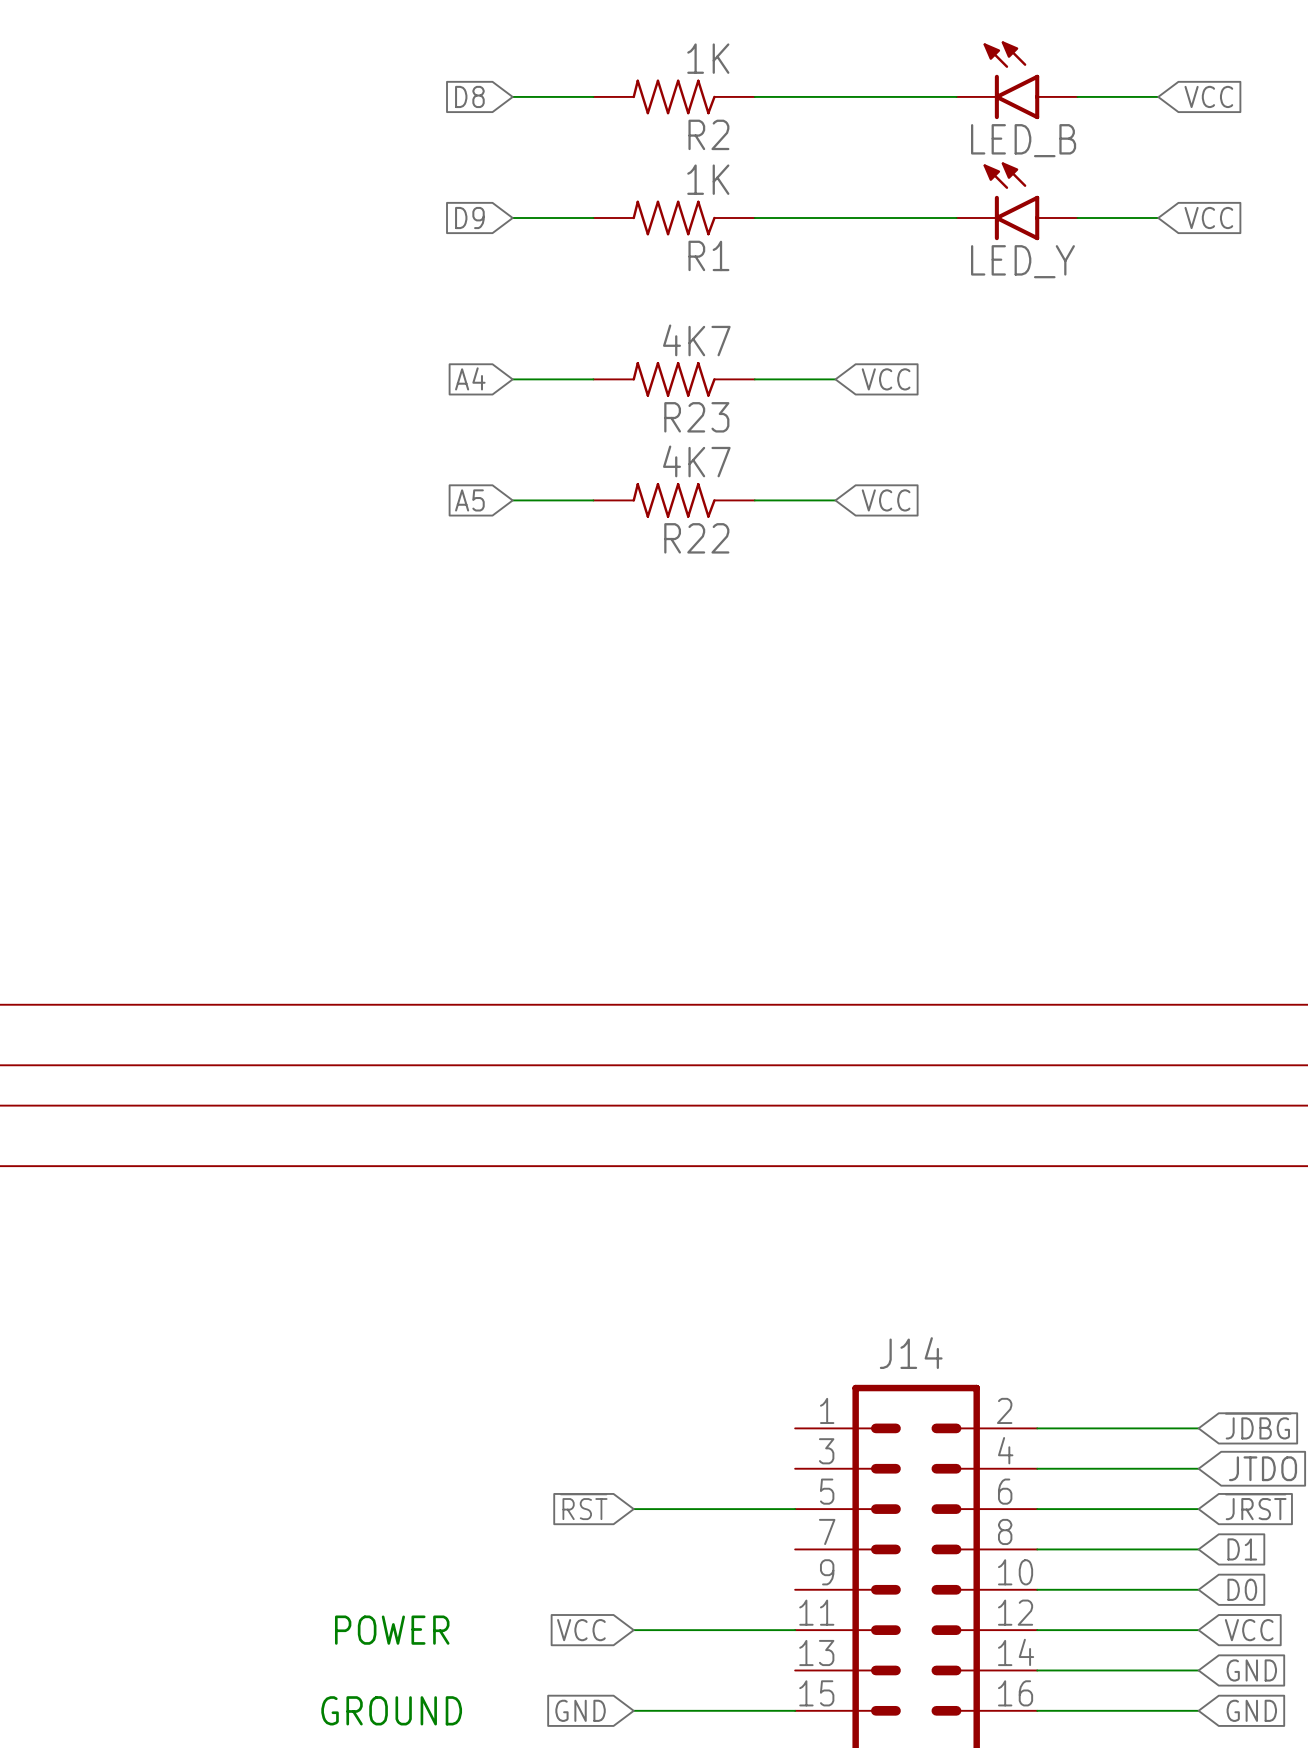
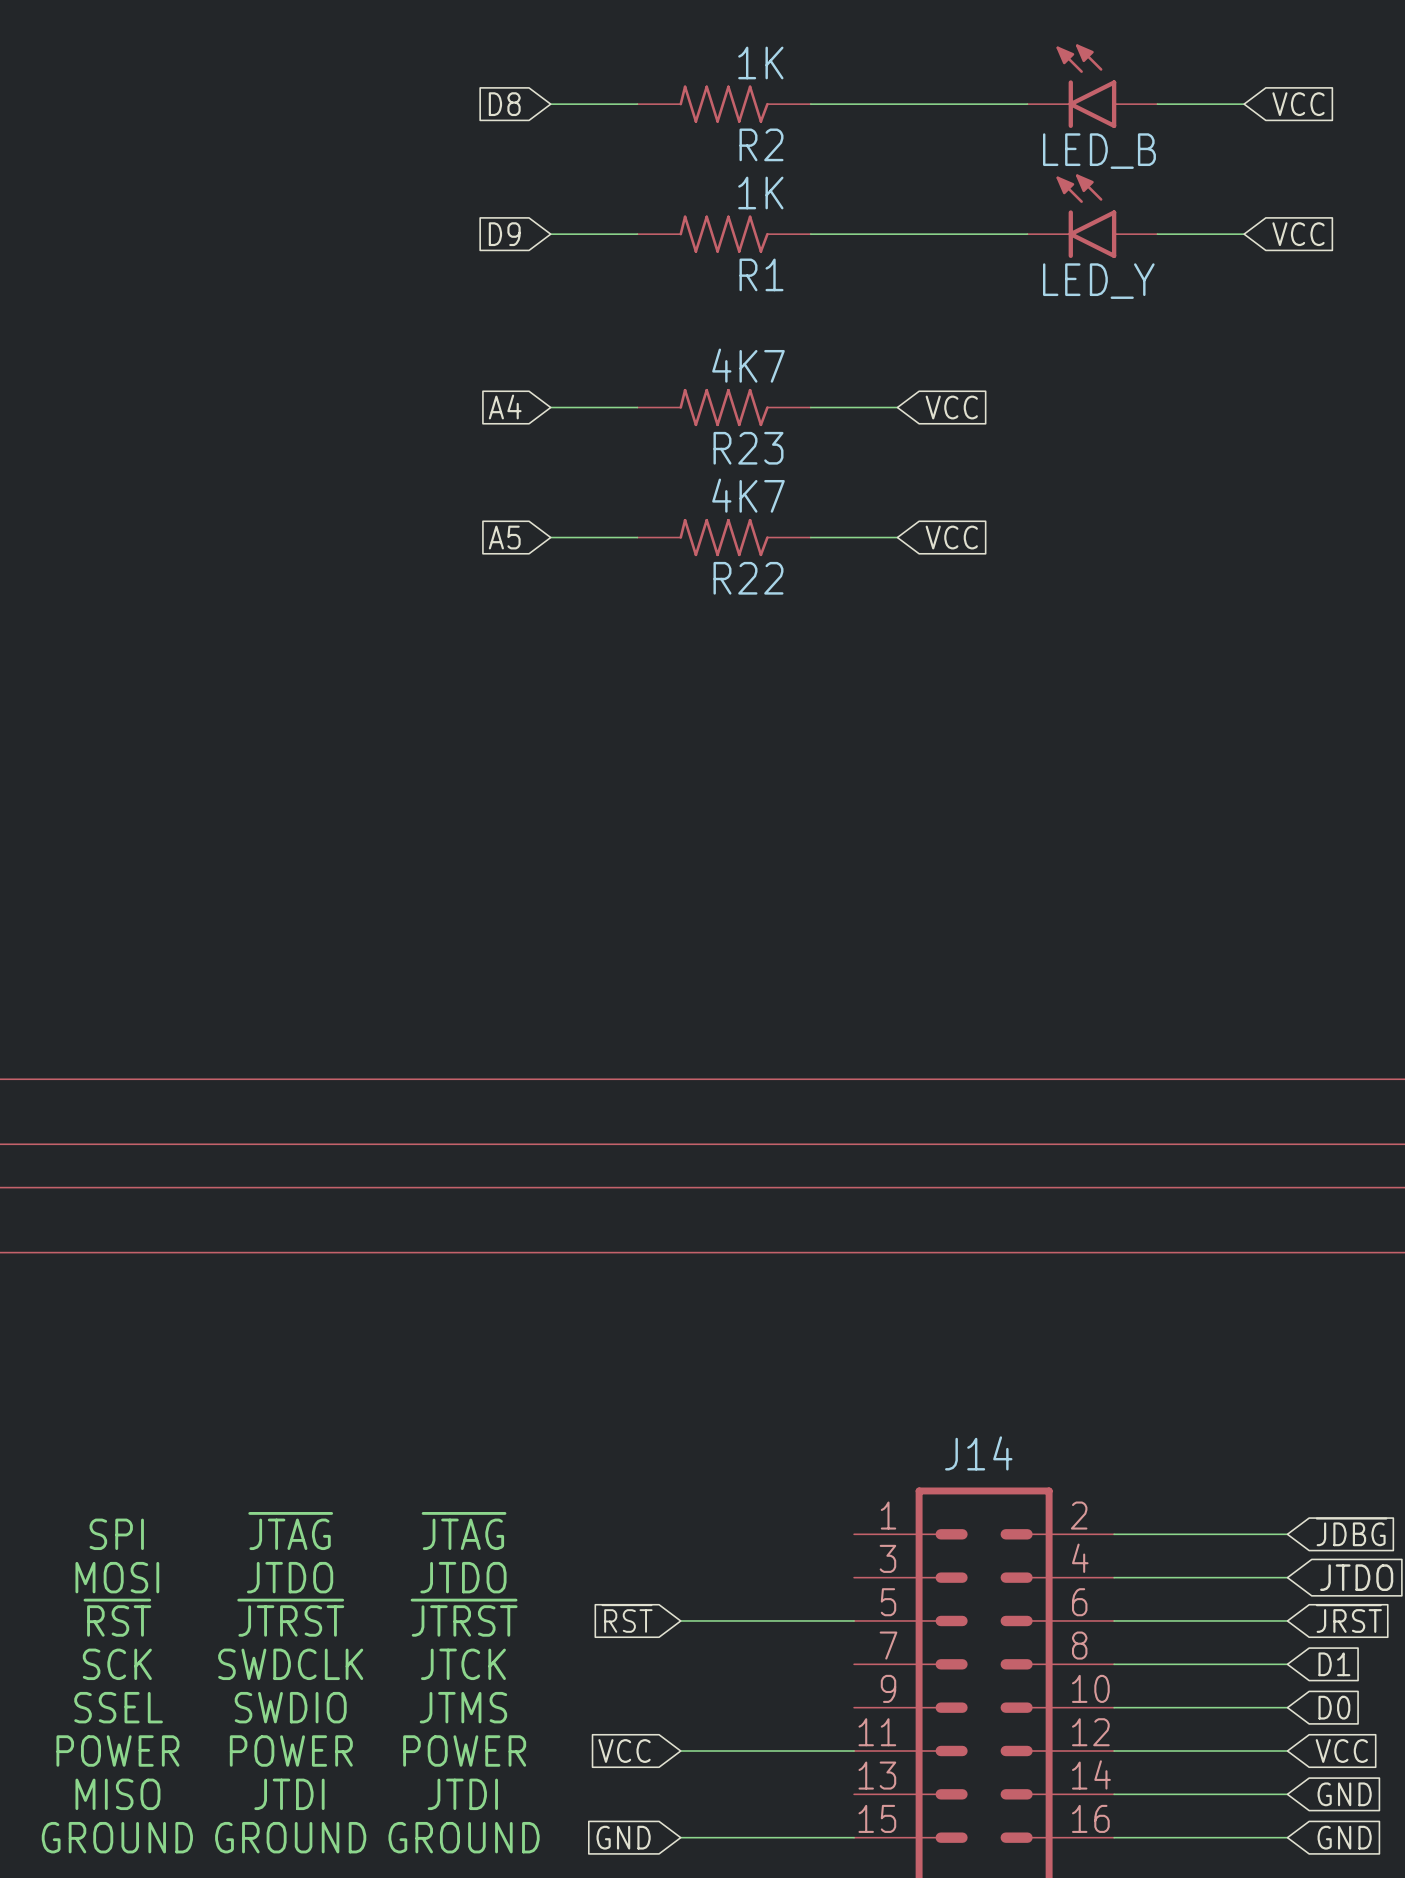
text: none -> ~{JTAG} (290, 1531)
text: none -> ~{JTAG} (464, 1531)
text: none -> SPI (116, 1534)
text: none -> MOSI (117, 1577)
text: none -> JTDO (290, 1577)
text: none -> JTDO (463, 1577)
text: none -> ~{RST} (117, 1617)
text: none -> ~{JTRST} (290, 1617)
text: none -> ~{JTRST} (464, 1617)
text: none -> SCK (117, 1664)
text: none -> SWDCLK (290, 1664)
text: none -> JTCK (463, 1664)
text: none -> SSEL (118, 1707)
text: none -> SWDIO (290, 1707)
text: none -> JTMS (463, 1707)
text: none -> POWER (117, 1751)
text: none -> POWER (291, 1751)
text position: POWER (392, 1630) -> POWER (464, 1751)
text: none -> MISO (117, 1794)
text: none -> JTDI (289, 1794)
text: none -> JTDI (462, 1794)
text: none -> GROUND (117, 1837)
text: none -> GROUND (290, 1837)
text position: GROUND (391, 1710) -> GROUND (464, 1837)

